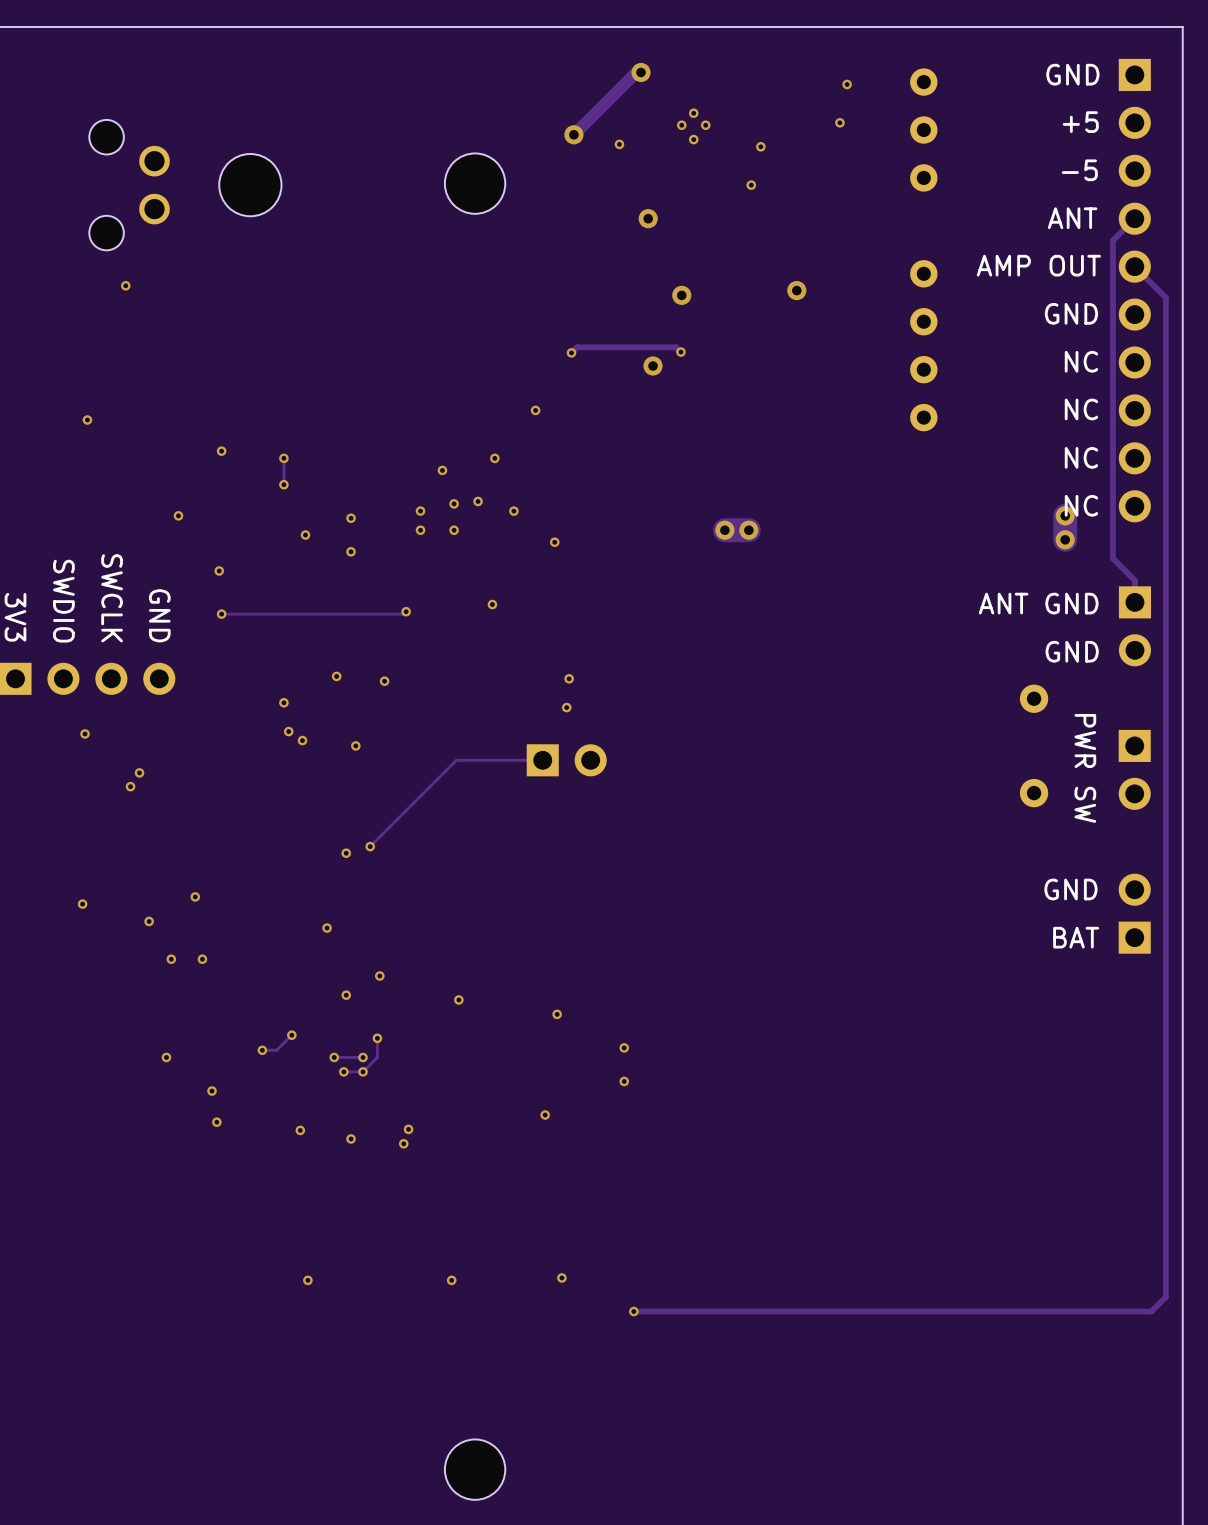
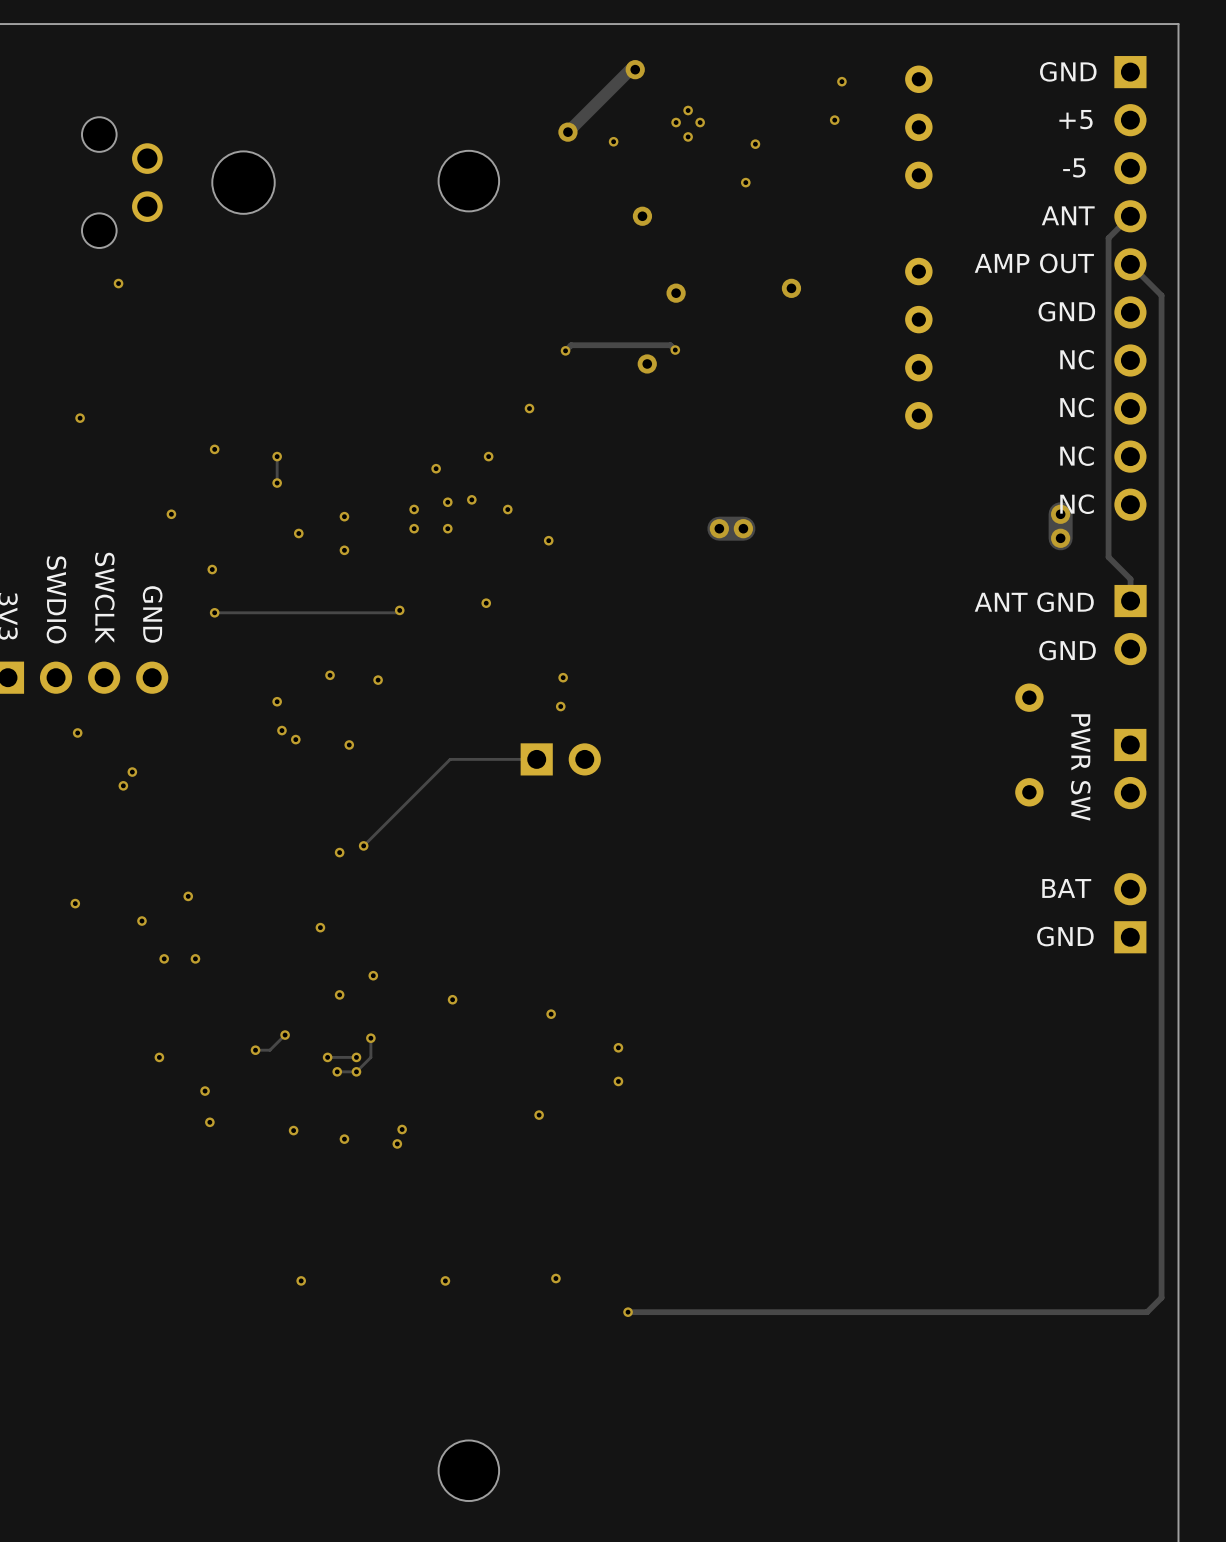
text: GND (1070, 889) -> BAT (1066, 888)
text: BAT (1076, 937) -> GND (1065, 936)

